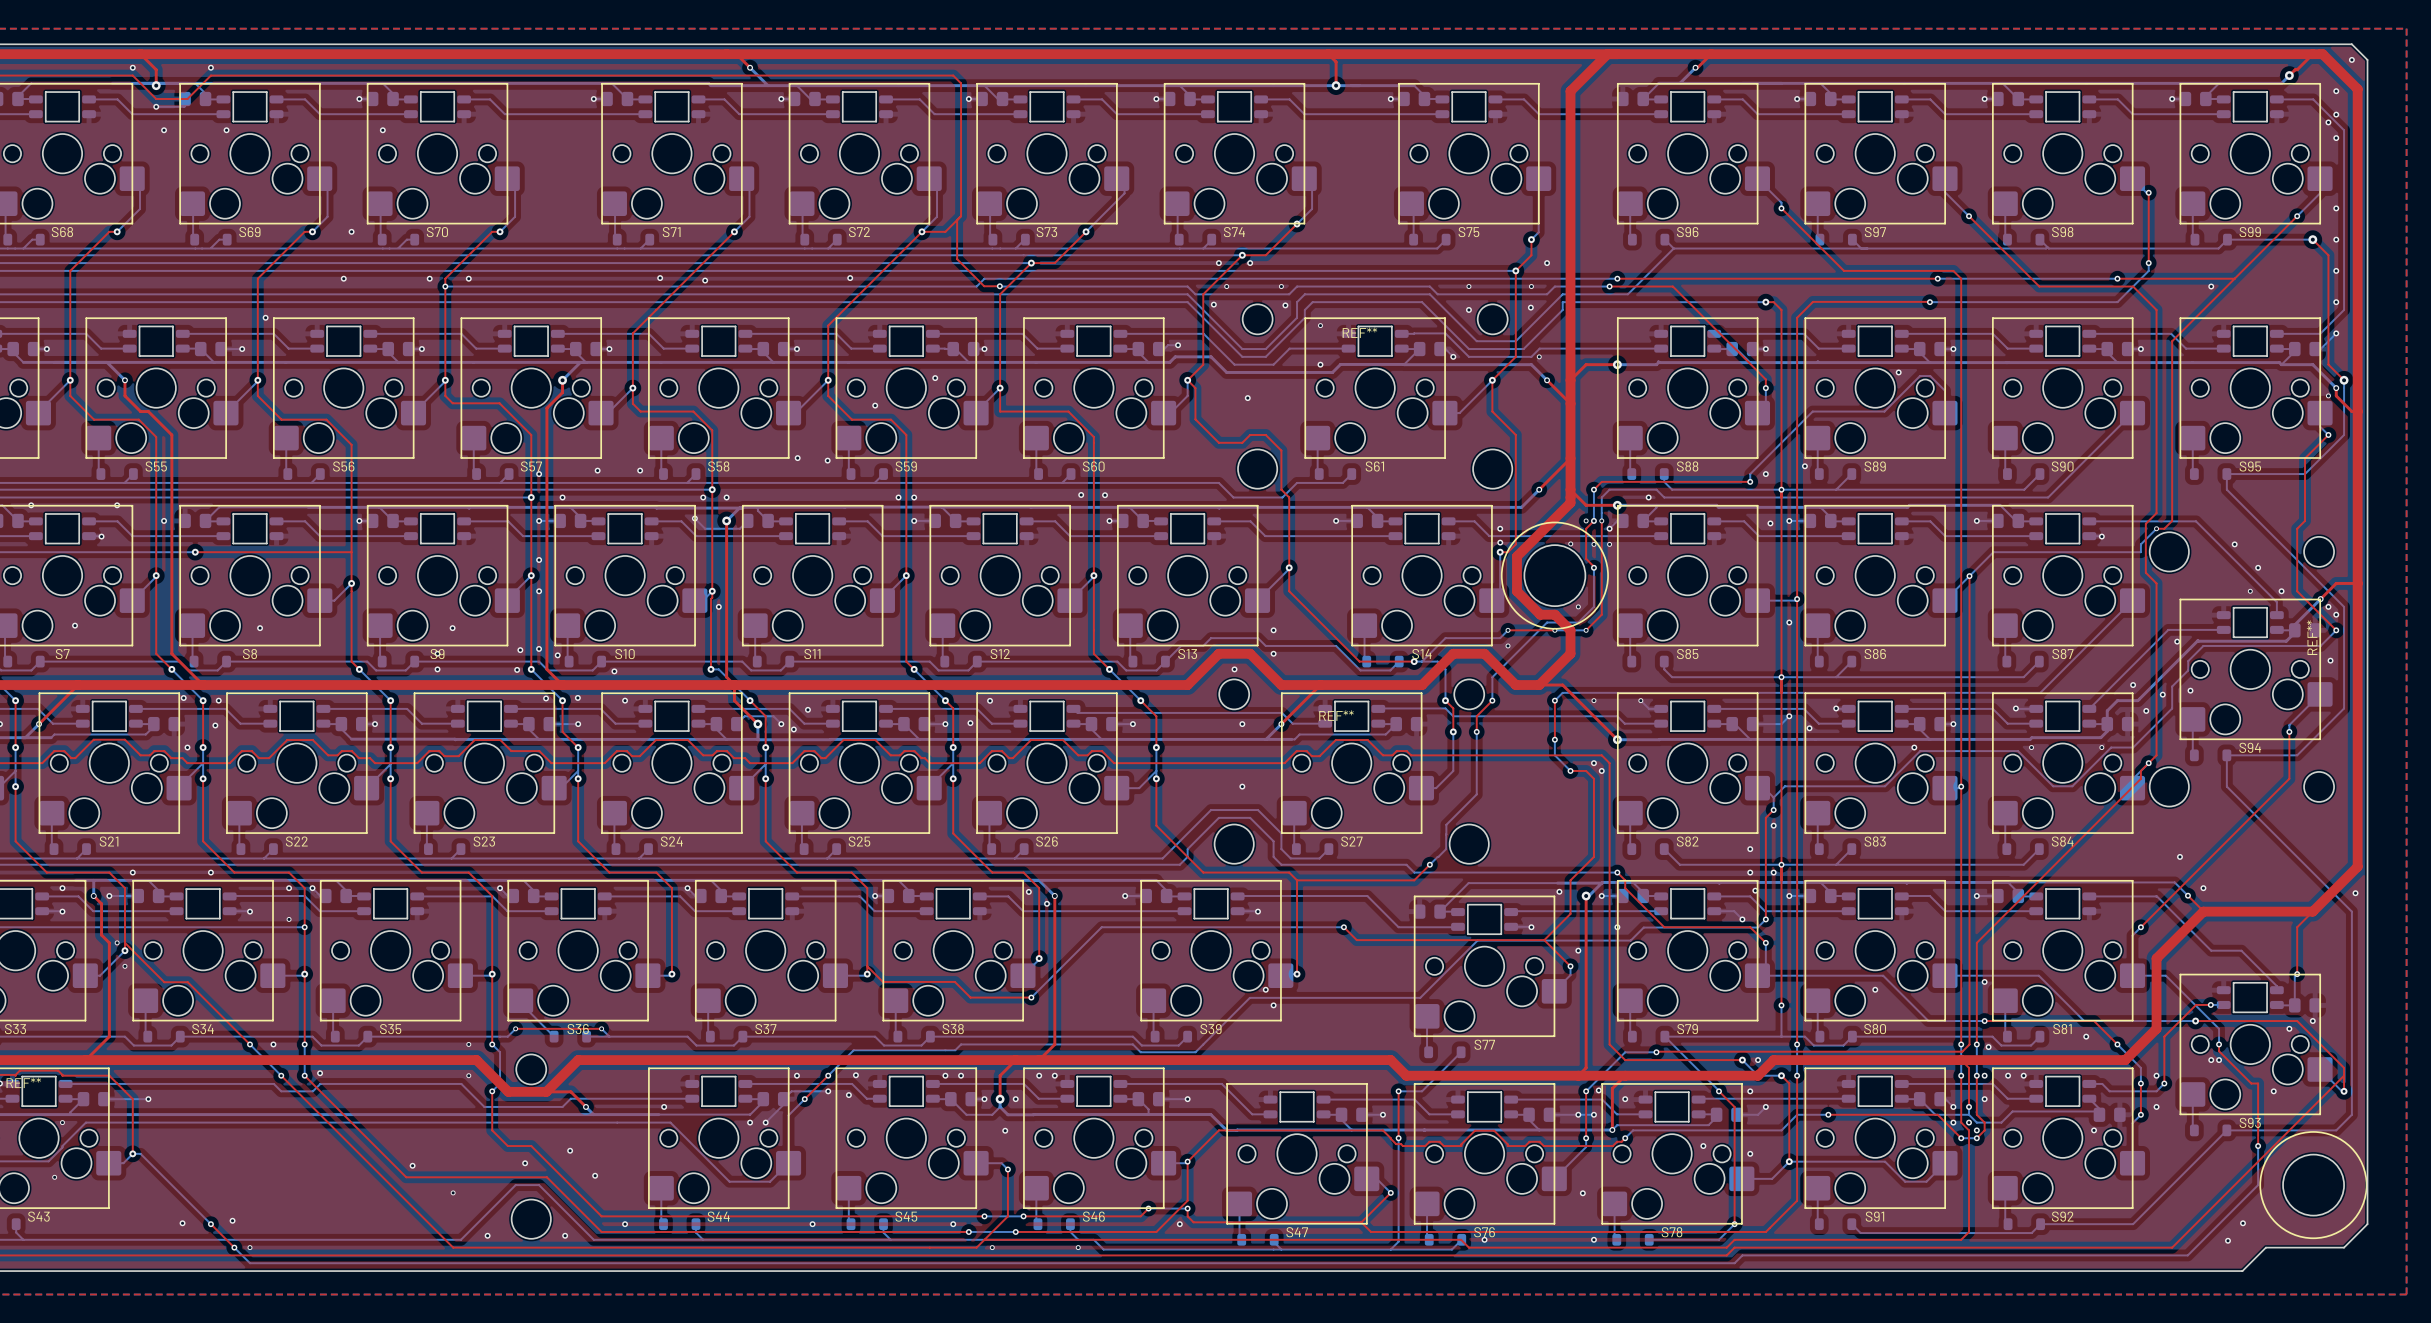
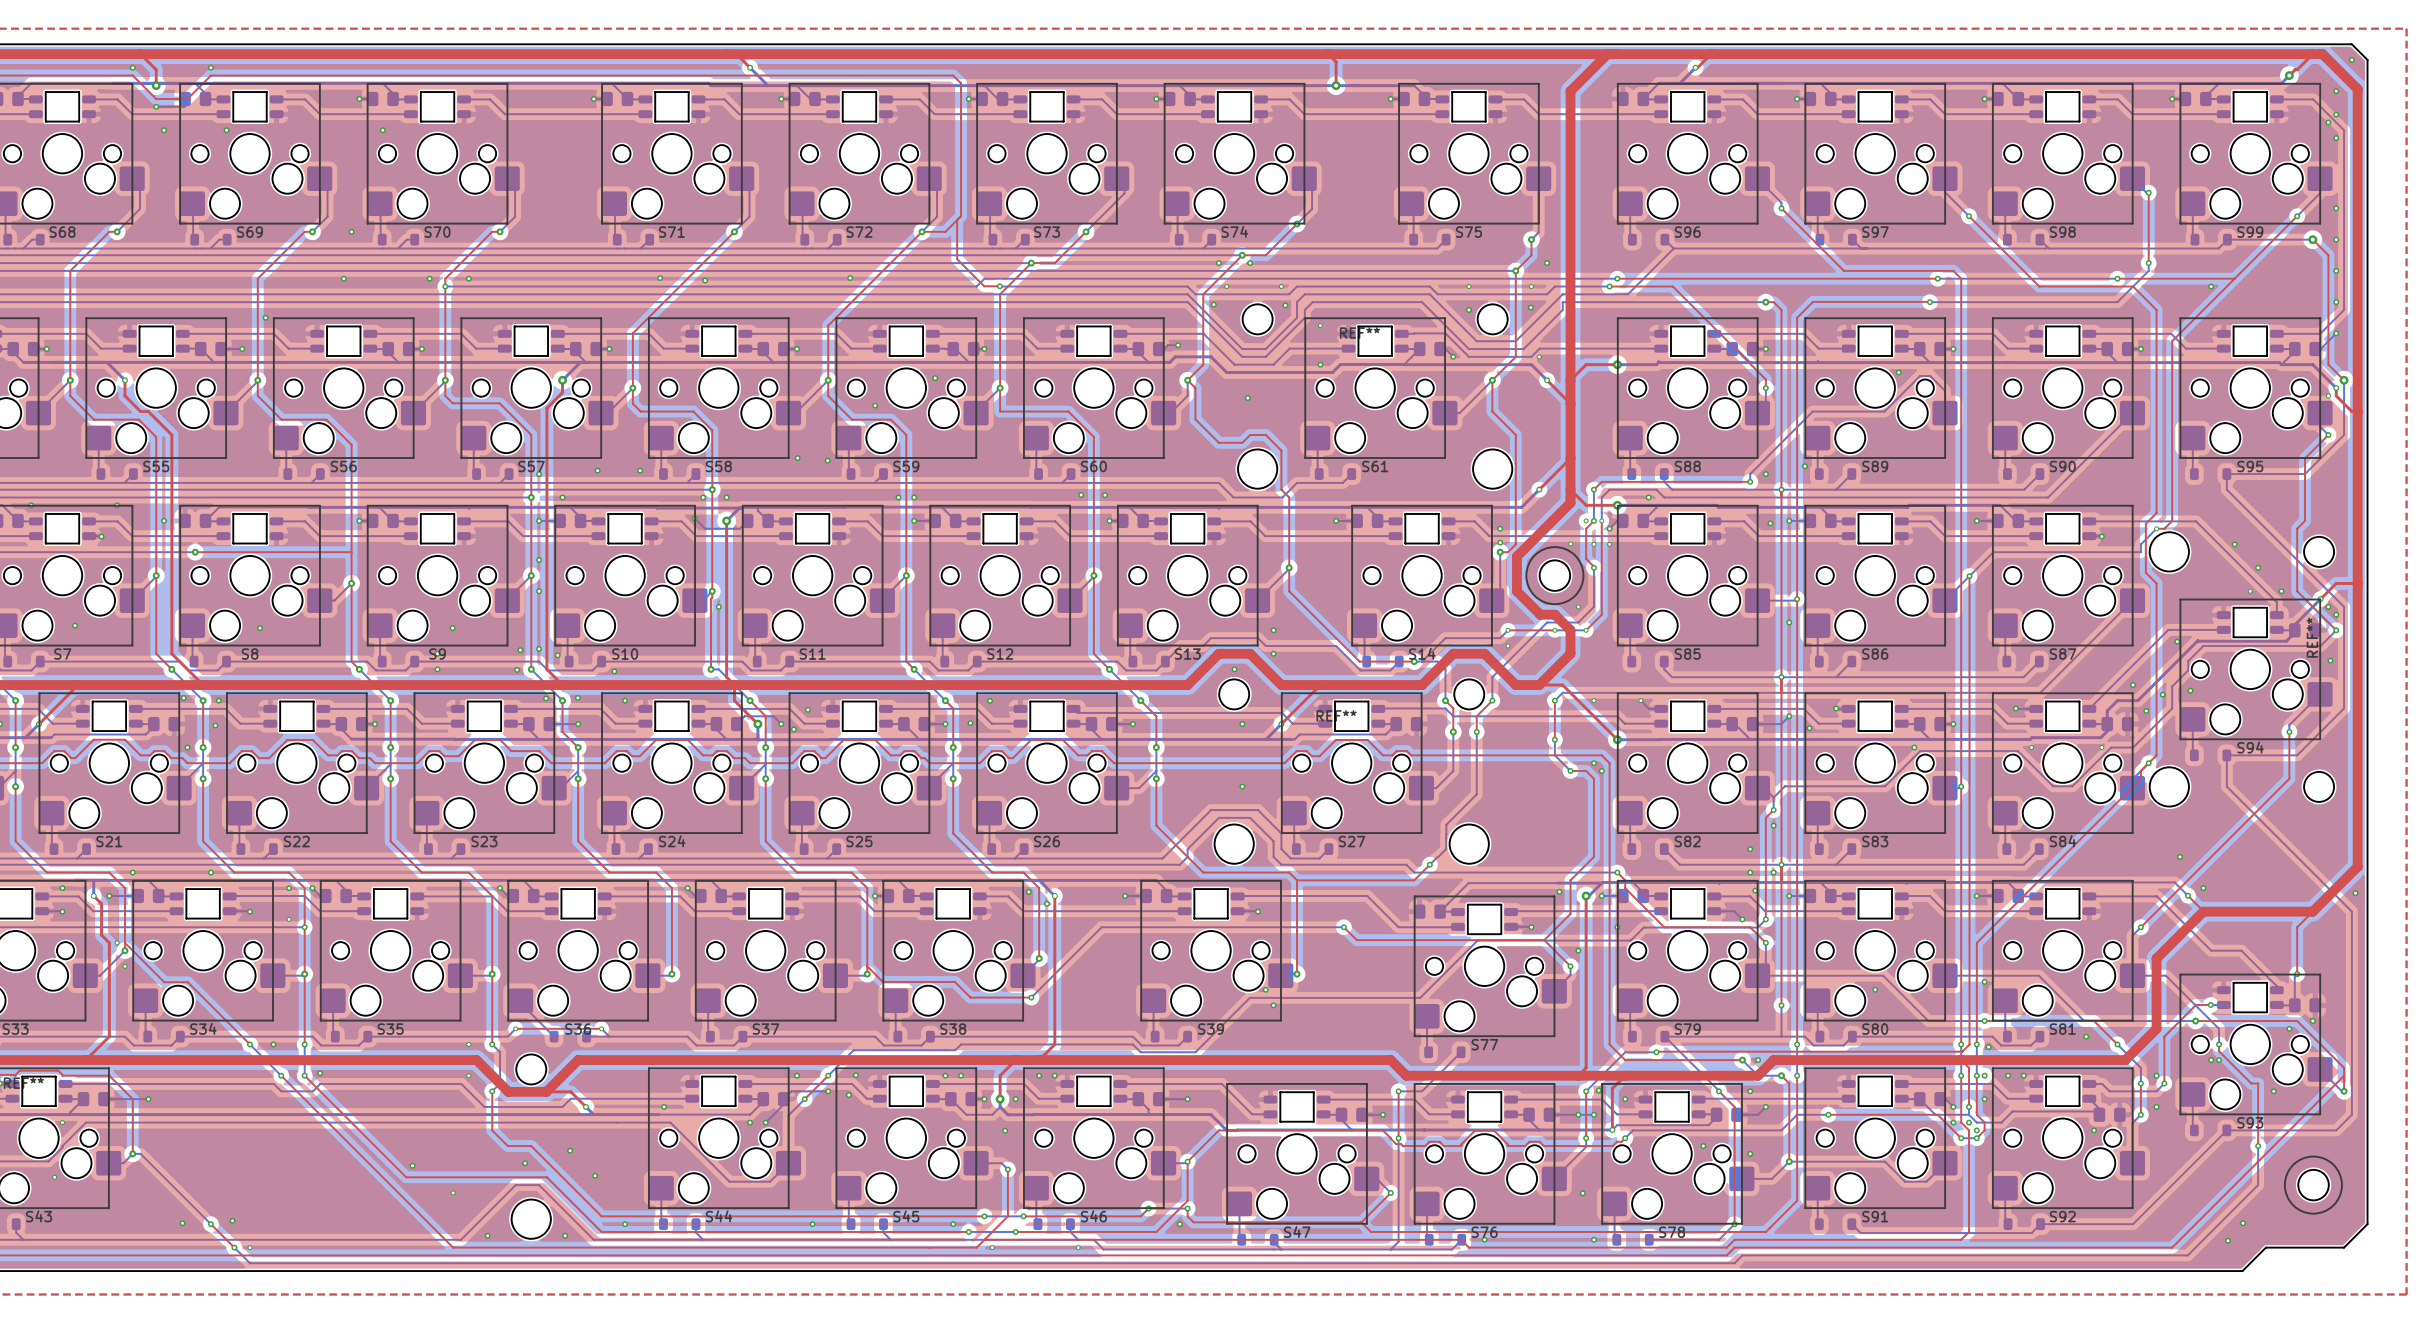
drawing shape: [1501, 521, 1609, 630] -> [1525, 546, 1584, 605]
round board edge size: [1524, 544, 1586, 607] -> [1539, 560, 1571, 592]
drawing shape: [2260, 1131, 2367, 1239] -> [2284, 1156, 2343, 1214]
round board edge size: [2282, 1154, 2345, 1216] -> [2298, 1169, 2330, 1201]

